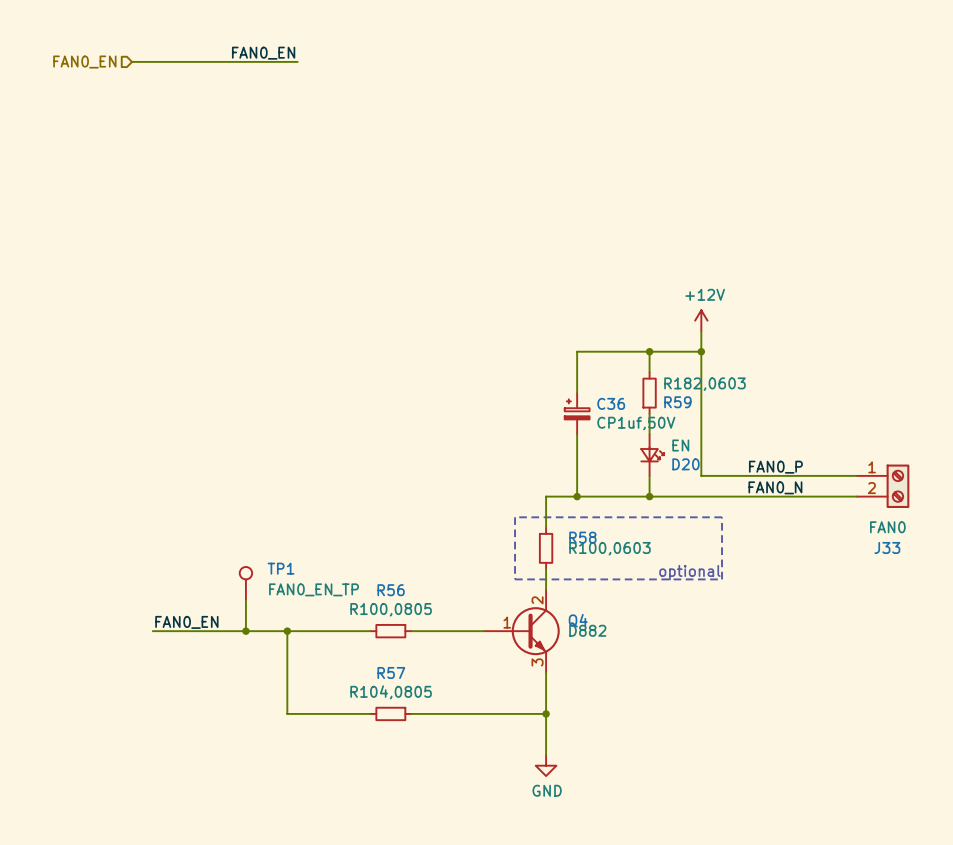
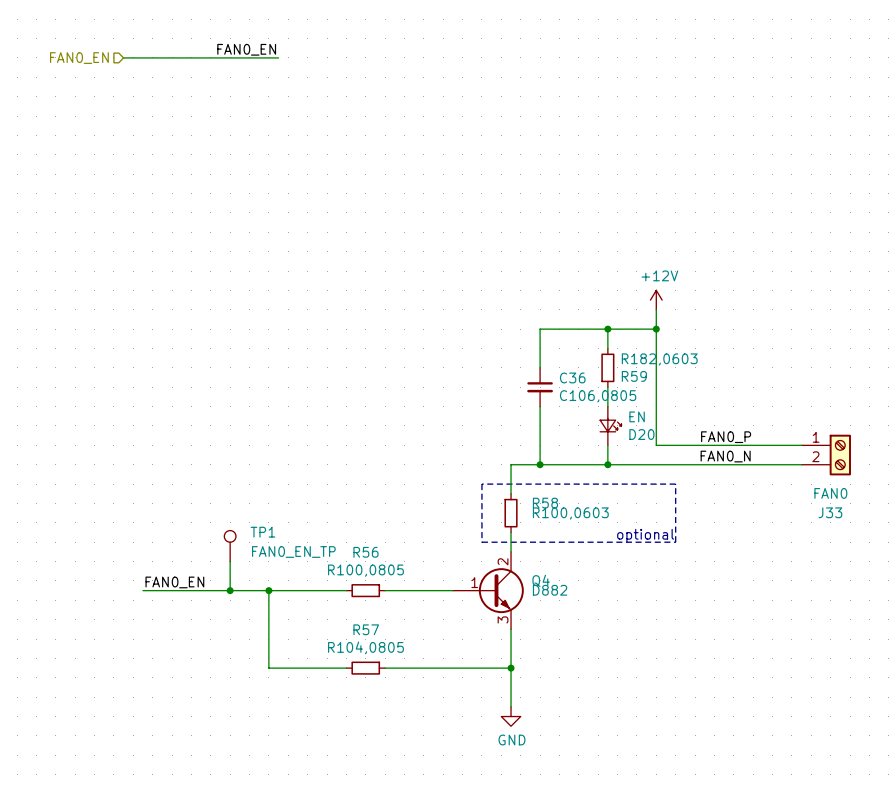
C36 symbol: [564, 393, 590, 435] -> [527, 367, 553, 407]
C36 value: CP1uf,50V (636, 423) -> C106,0805 (598, 396)

